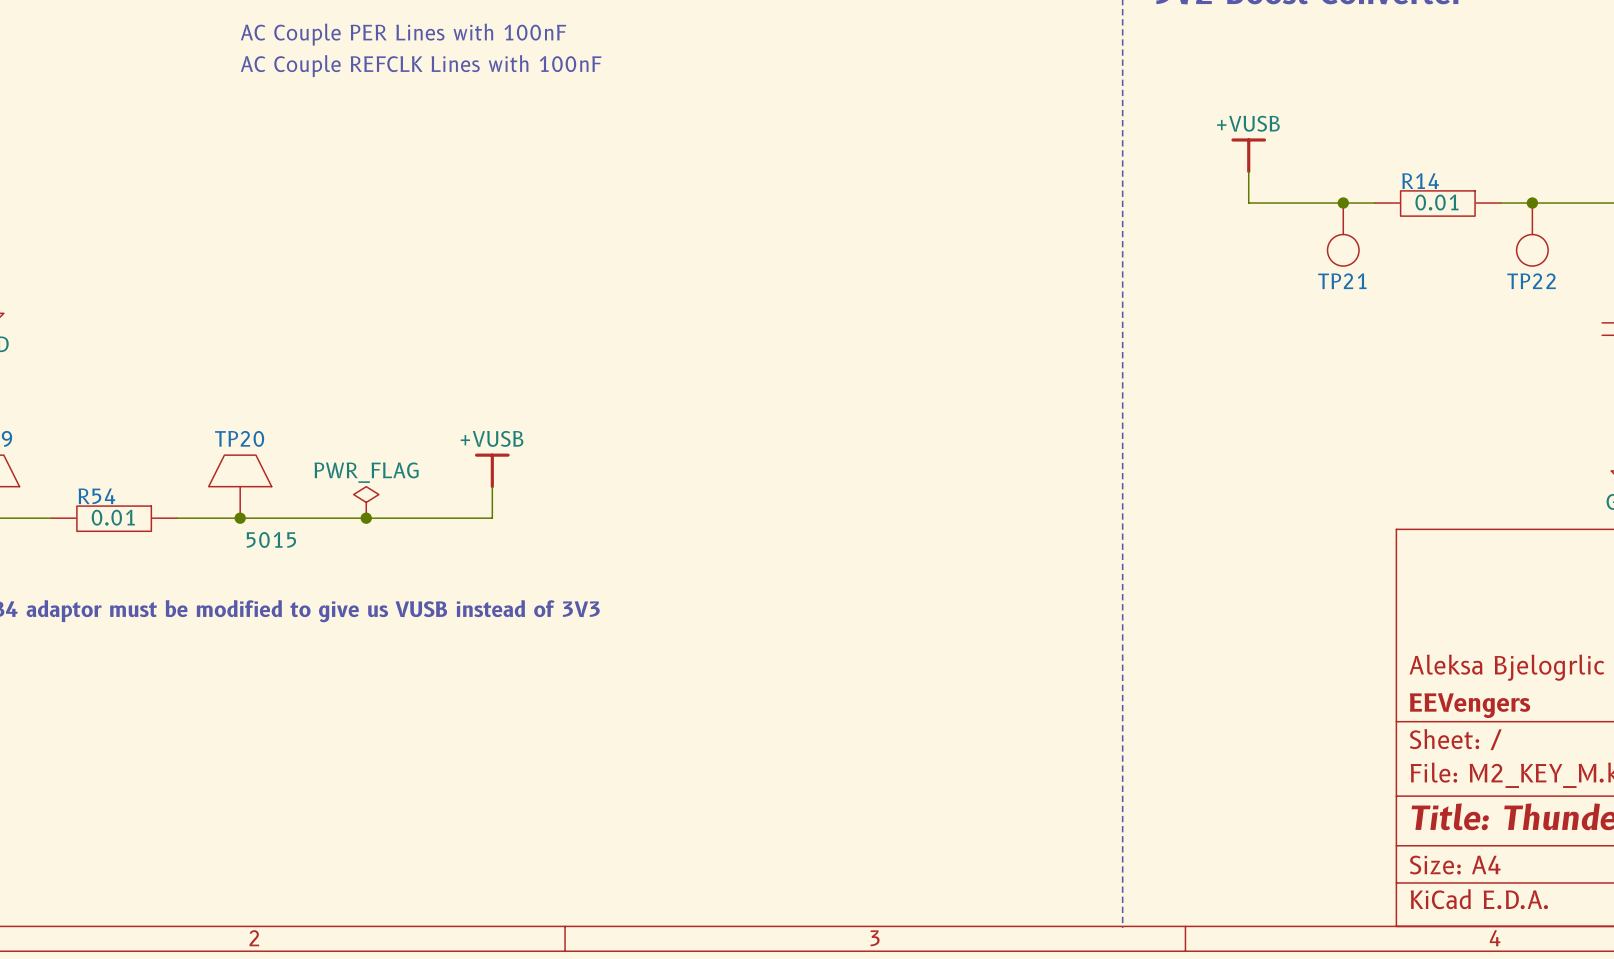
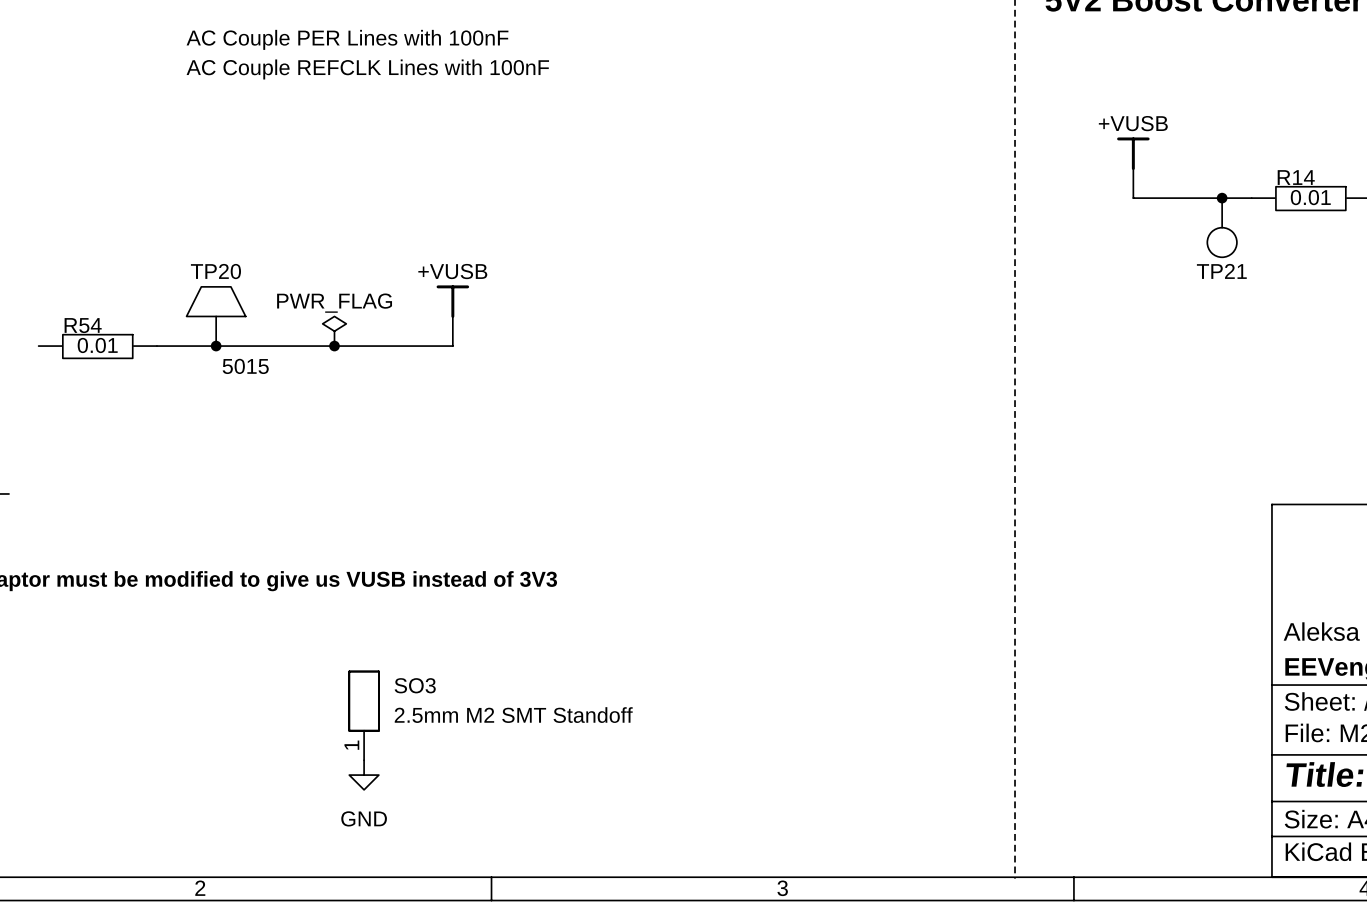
junction: none -> (216, 346)
junction: none -> (334, 346)
power symbol position: +VUSB (492, 470) -> +VUSB (452, 301)
TP20 position: (240, 486) -> (216, 316)
wire: (492, 486) (492, 518) (177, 518) -> (452, 316) (452, 346) (156, 346)
power symbol position: PWR_FLAG (366, 502) -> PWR_FLAG (334, 331)
R54 position: (114, 518) -> (97, 346)
junction: (240, 518) -> none
junction: (366, 518) -> none
SO3: none -> 2.5mm M2 SMT Standoff (364, 715)
power symbol: none -> GND (364, 775)

